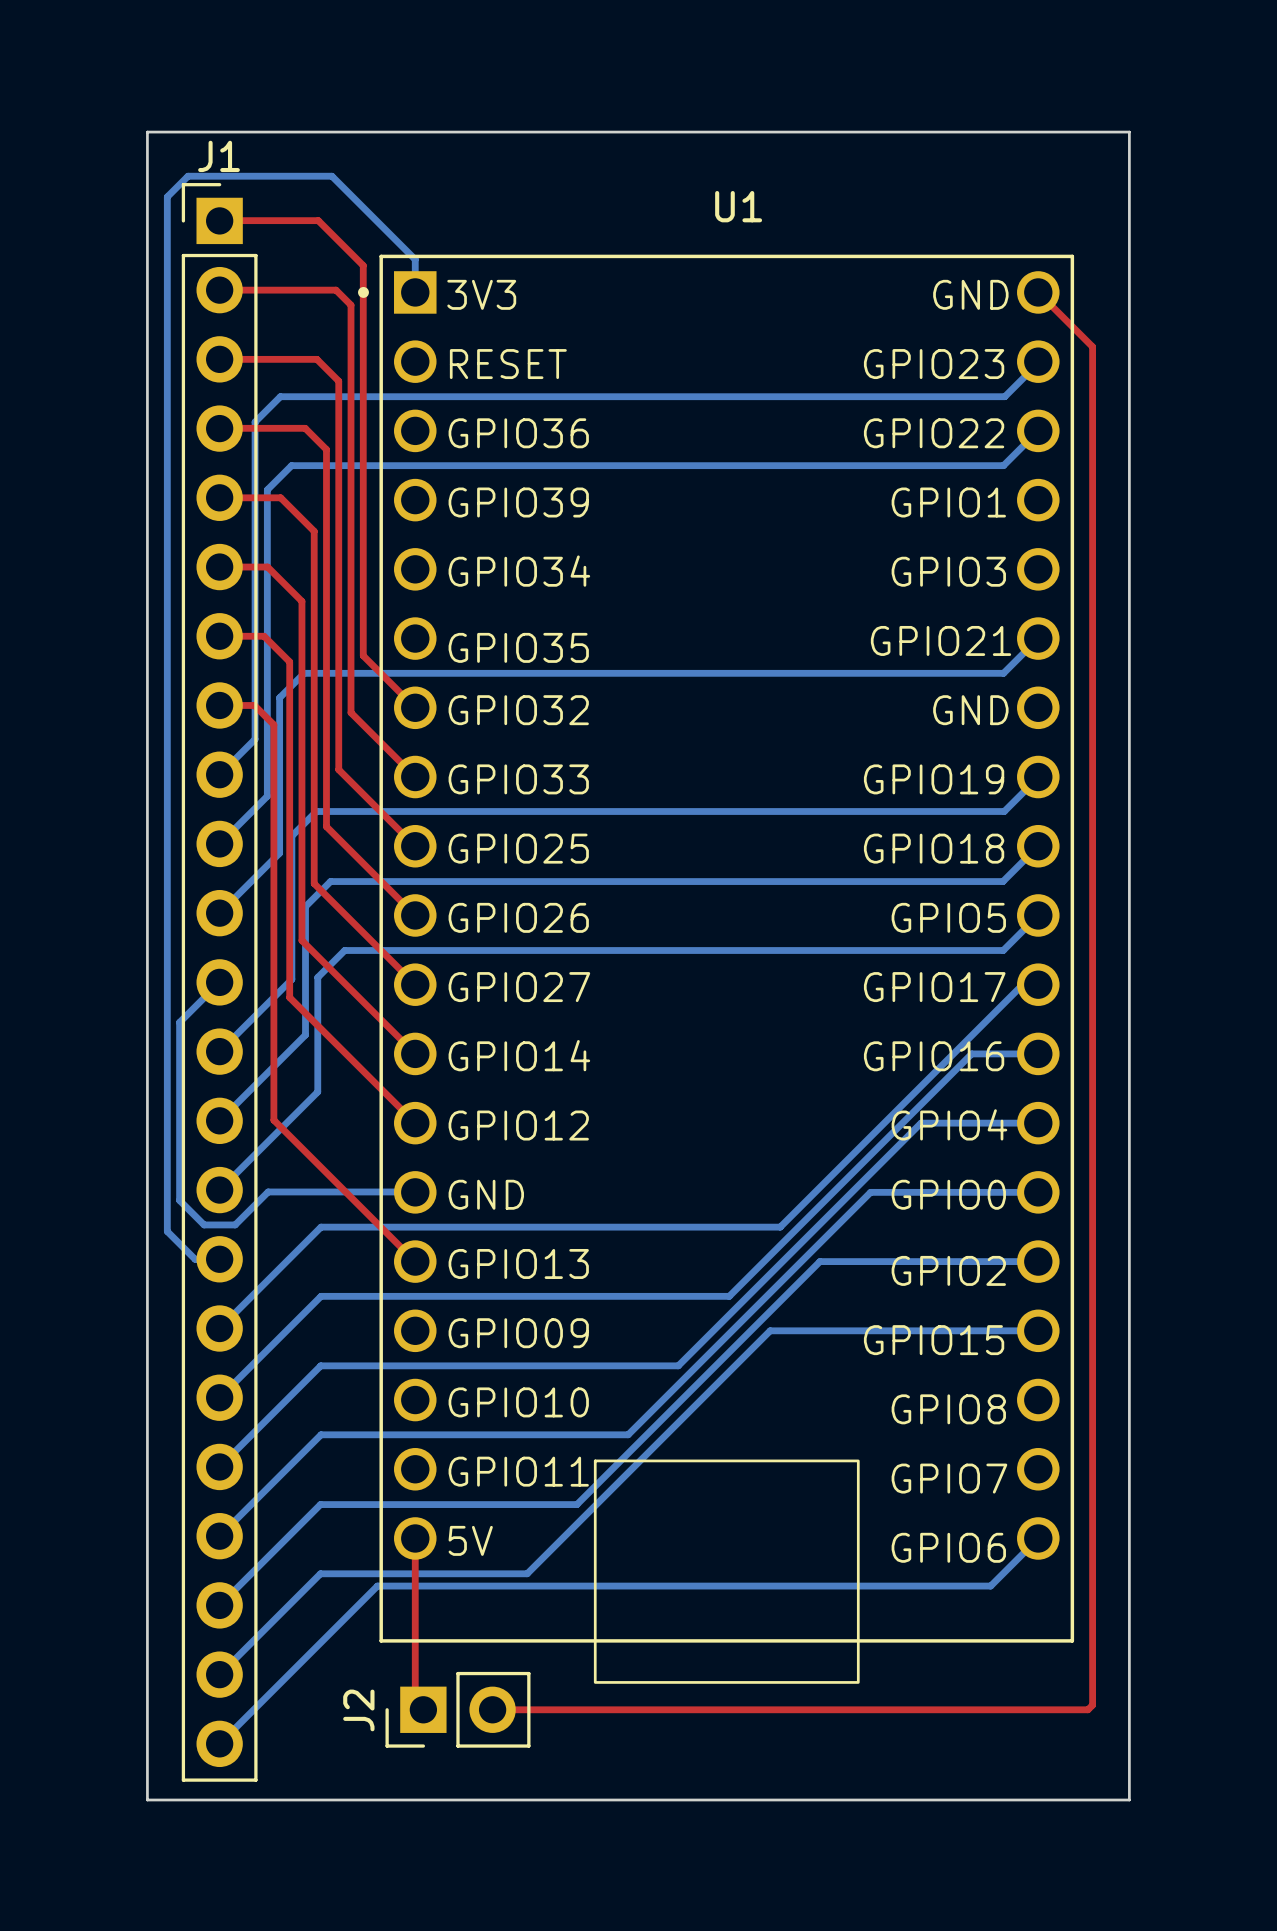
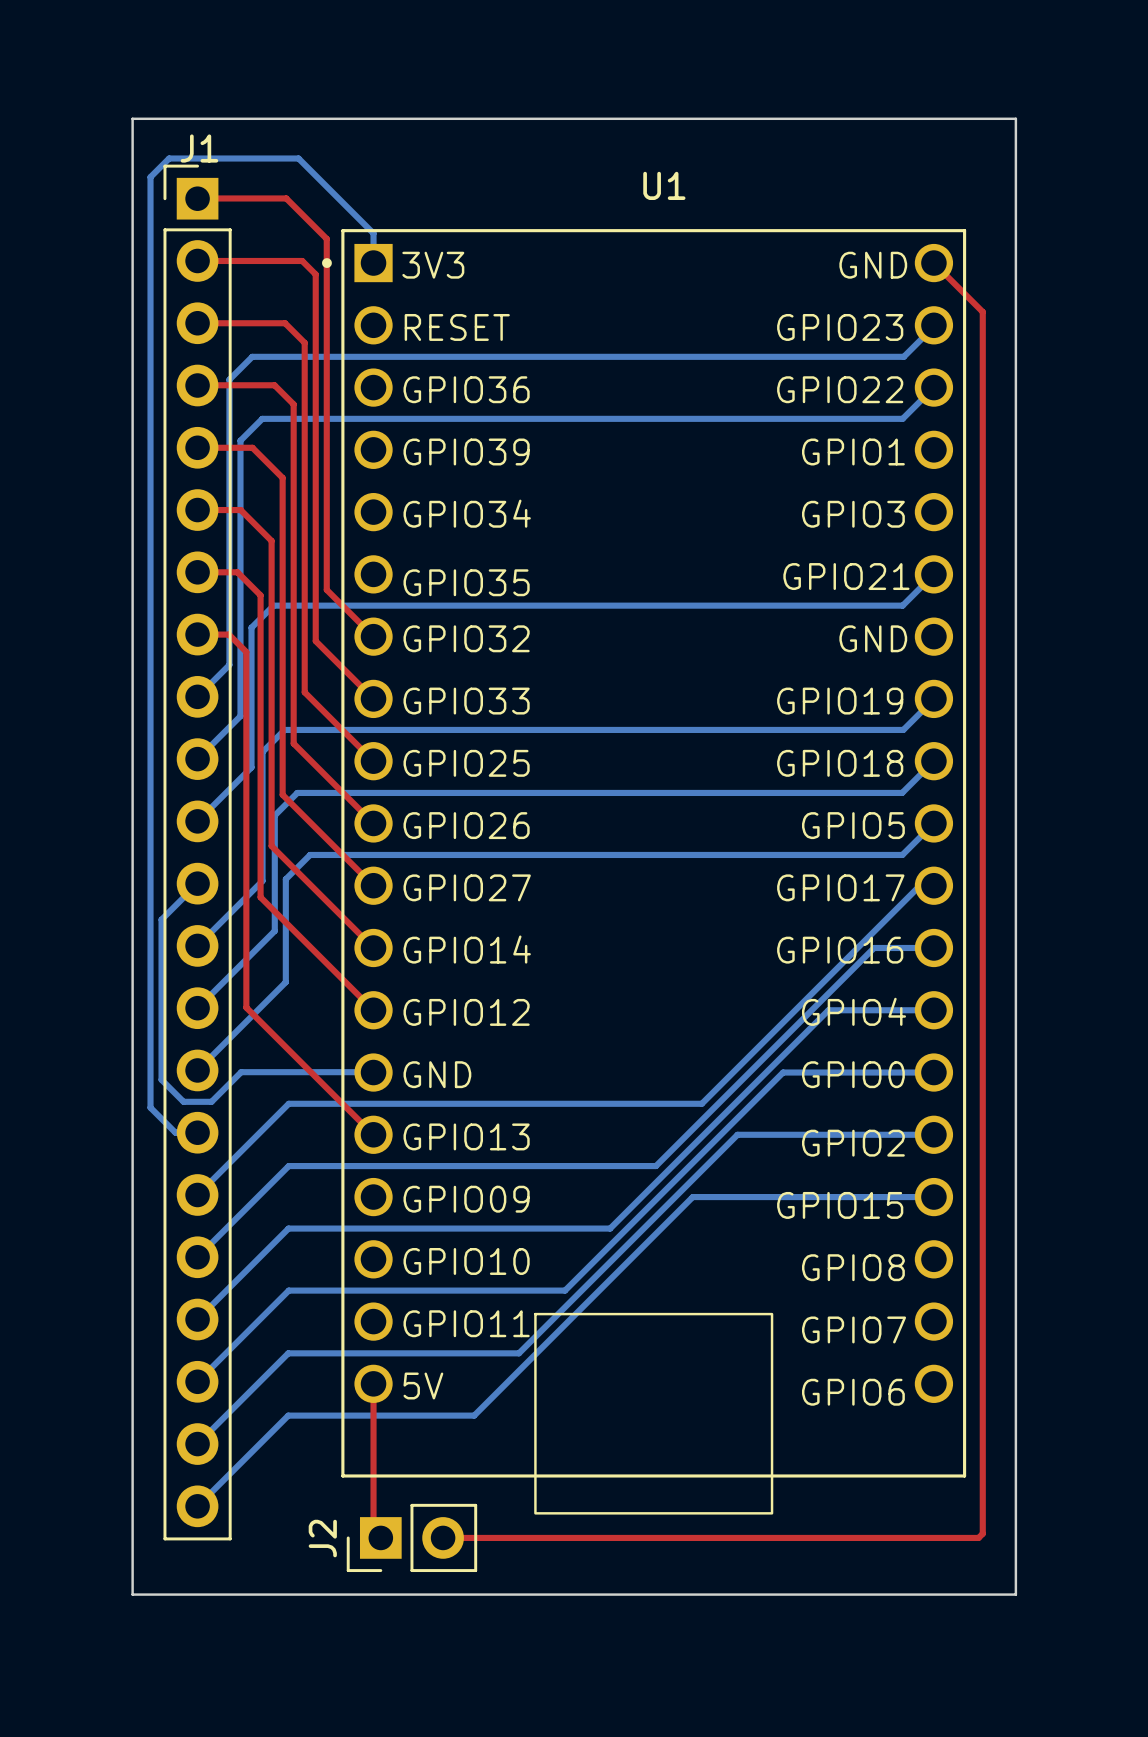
J1 footprint: [181, 183, 258, 1782] -> [163, 164, 232, 1541]
bottom track: (1038, 1538) (990, 1586) (377, 1586) (219, 1743) -> none
board edge: (147, 1772) (147, 1800) (1129, 1800) (1129, 1772) -> (132, 1594) (1015, 1594)

